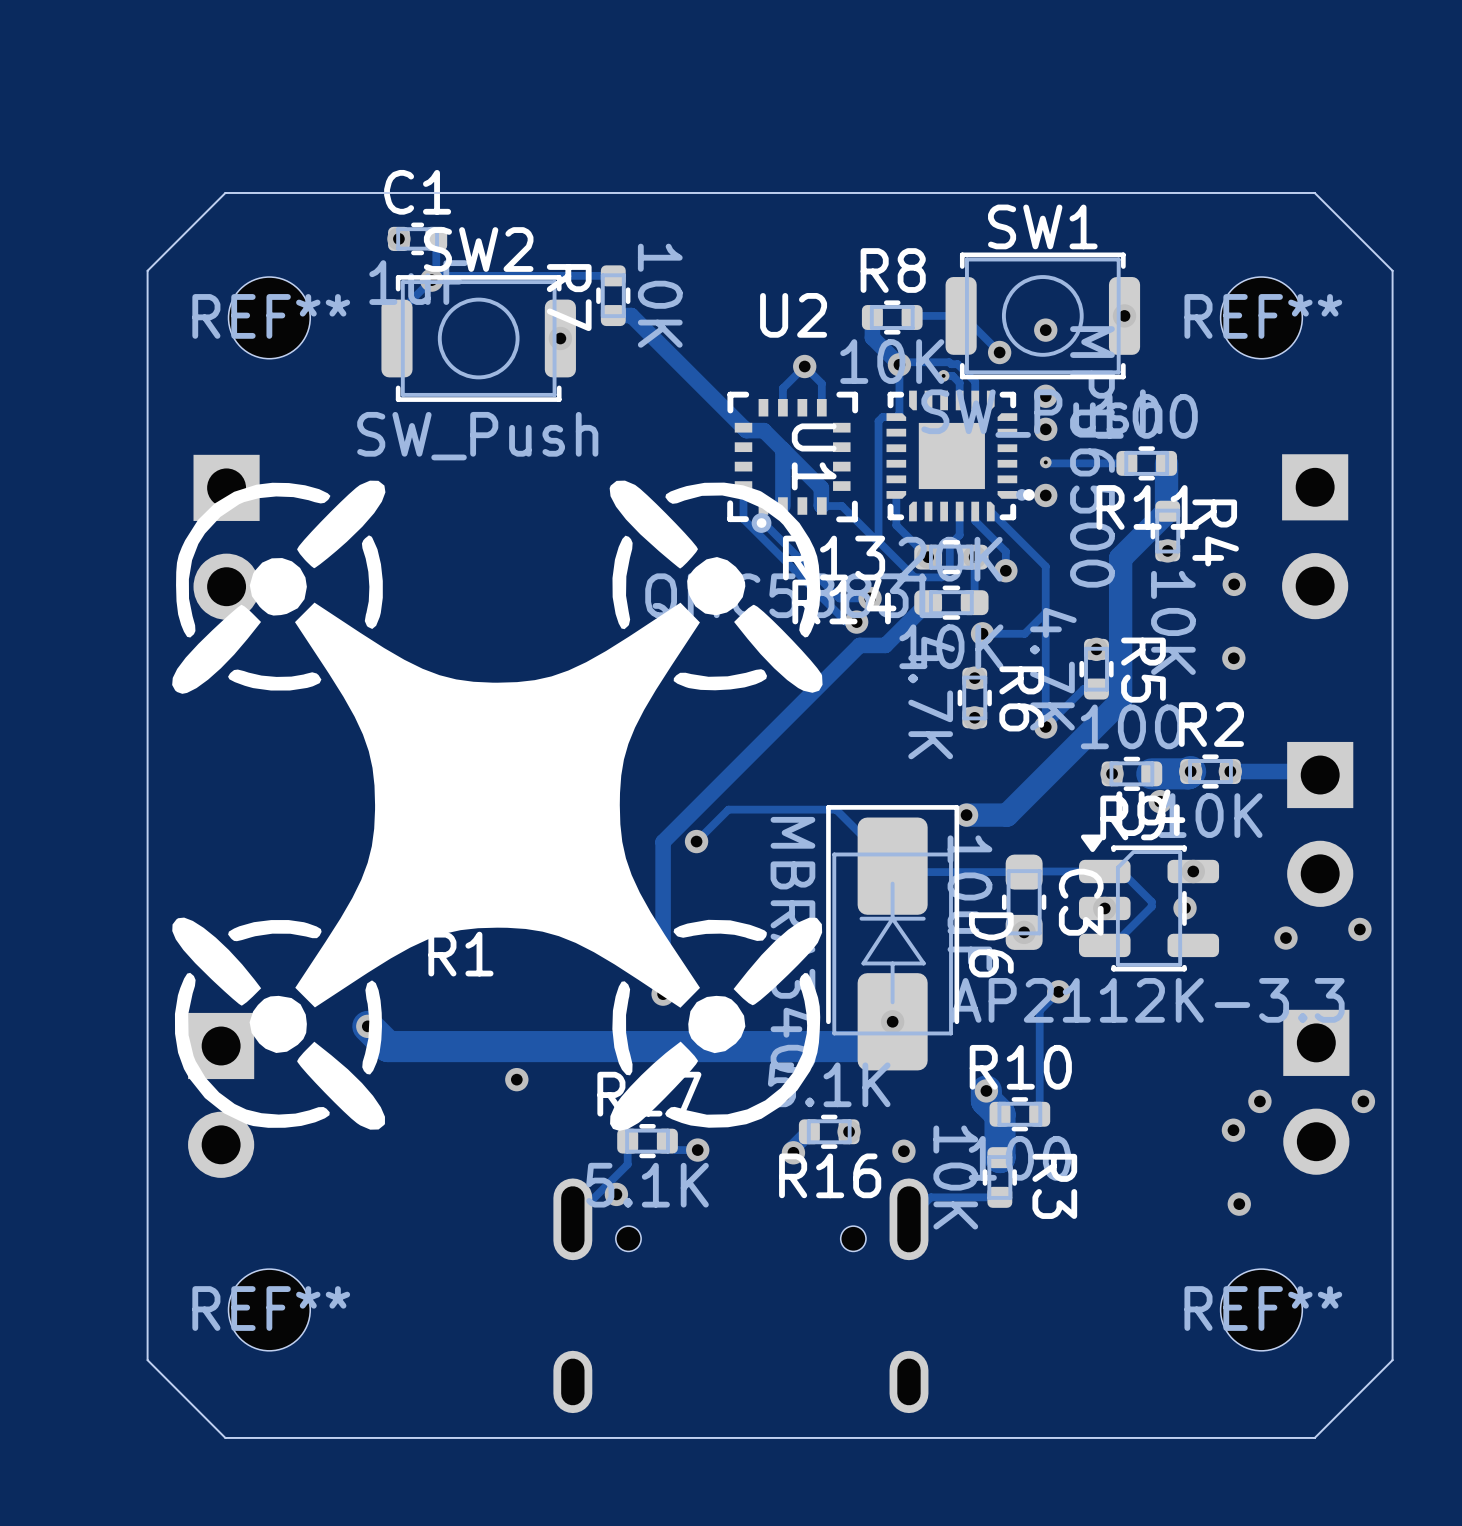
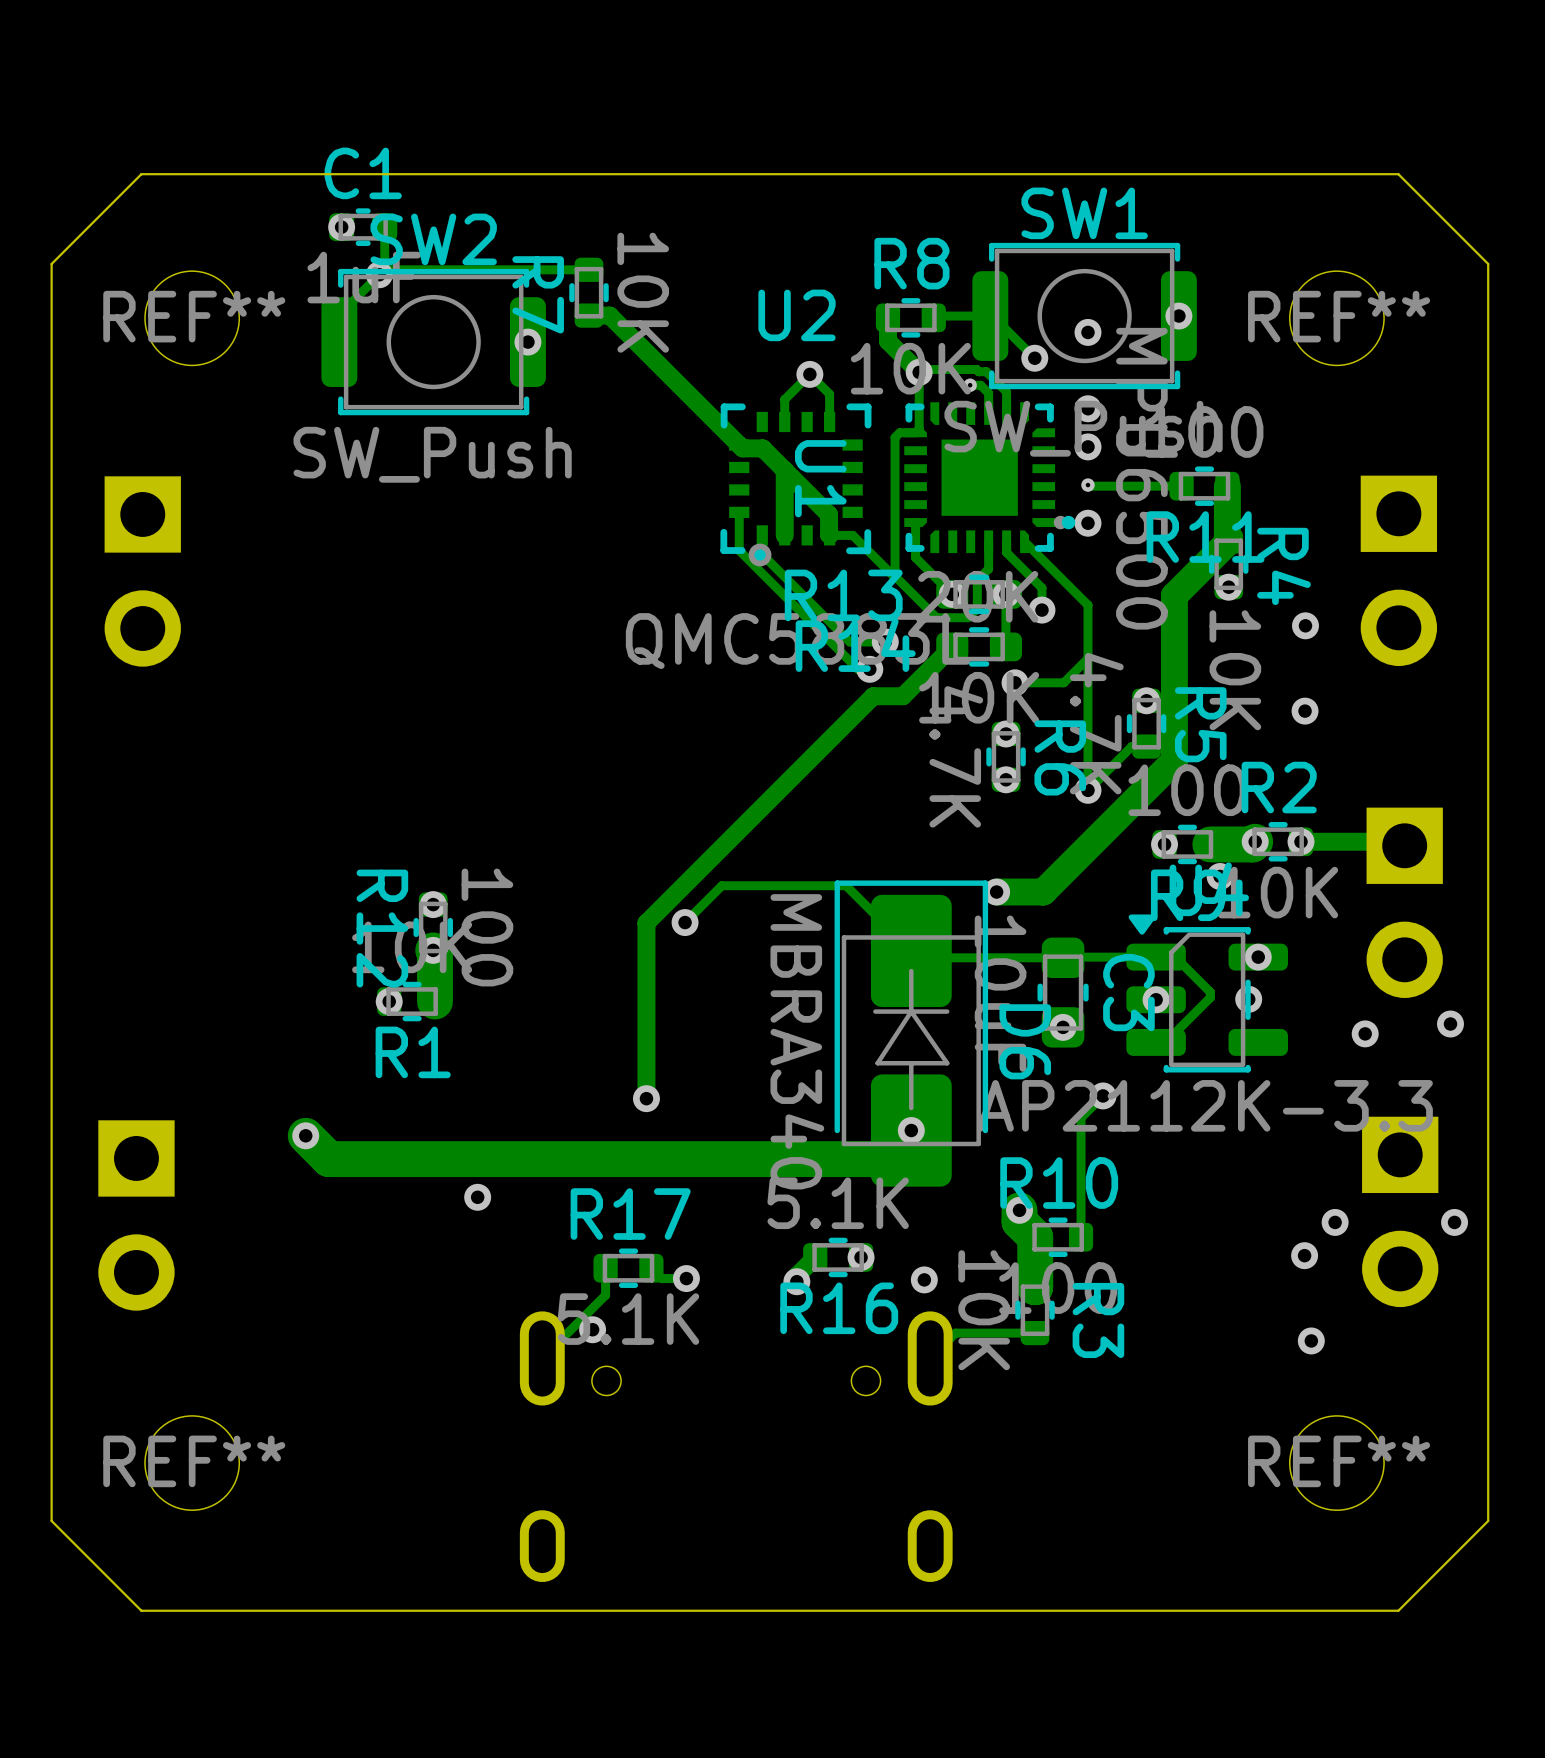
part: (497, 805) -> none

